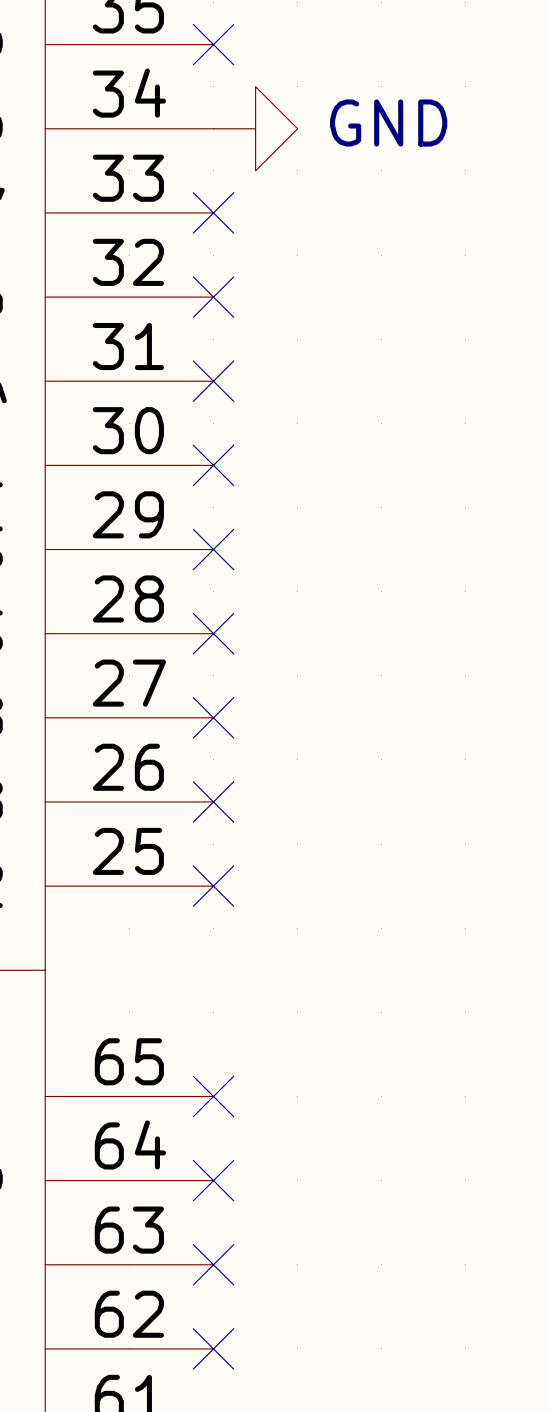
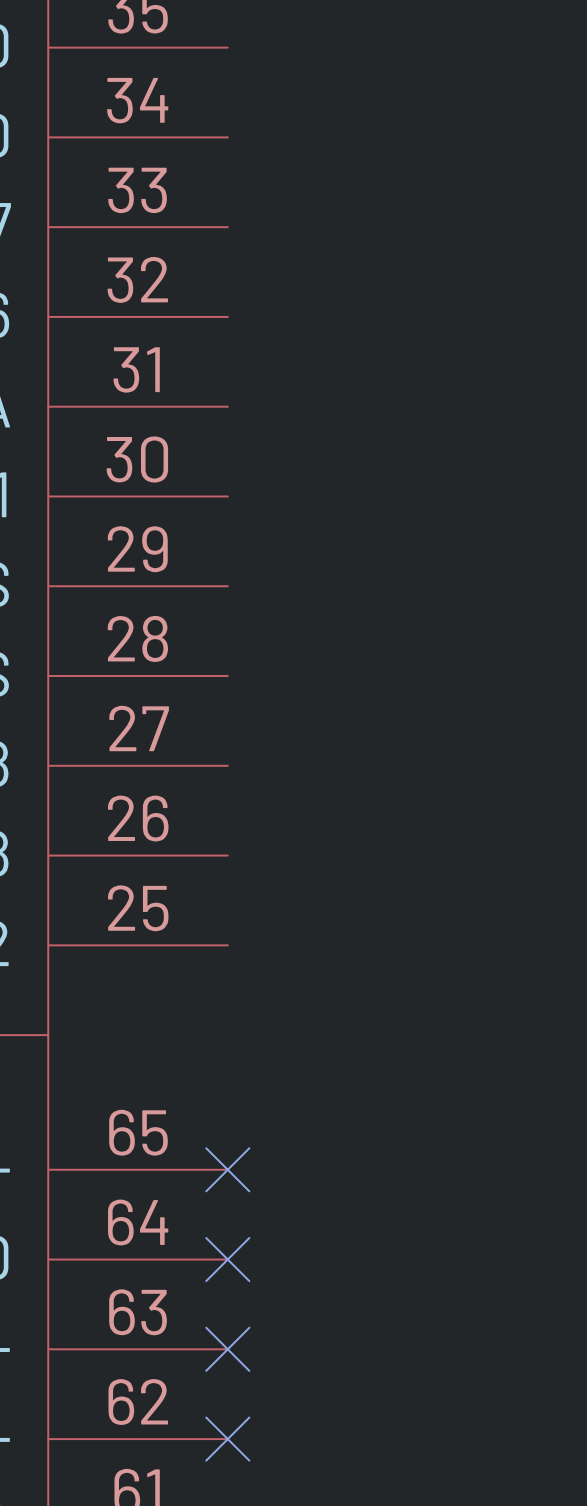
no-connect mark: (213, 44) -> none
power symbol: GND (255, 128) -> none
no-connect mark: (213, 212) -> none
no-connect mark: (213, 297) -> none
no-connect mark: (213, 381) -> none
no-connect mark: (213, 465) -> none
no-connect mark: (213, 549) -> none
no-connect mark: (213, 633) -> none
no-connect mark: (213, 717) -> none
no-connect mark: (213, 801) -> none
no-connect mark: (213, 886) -> none

